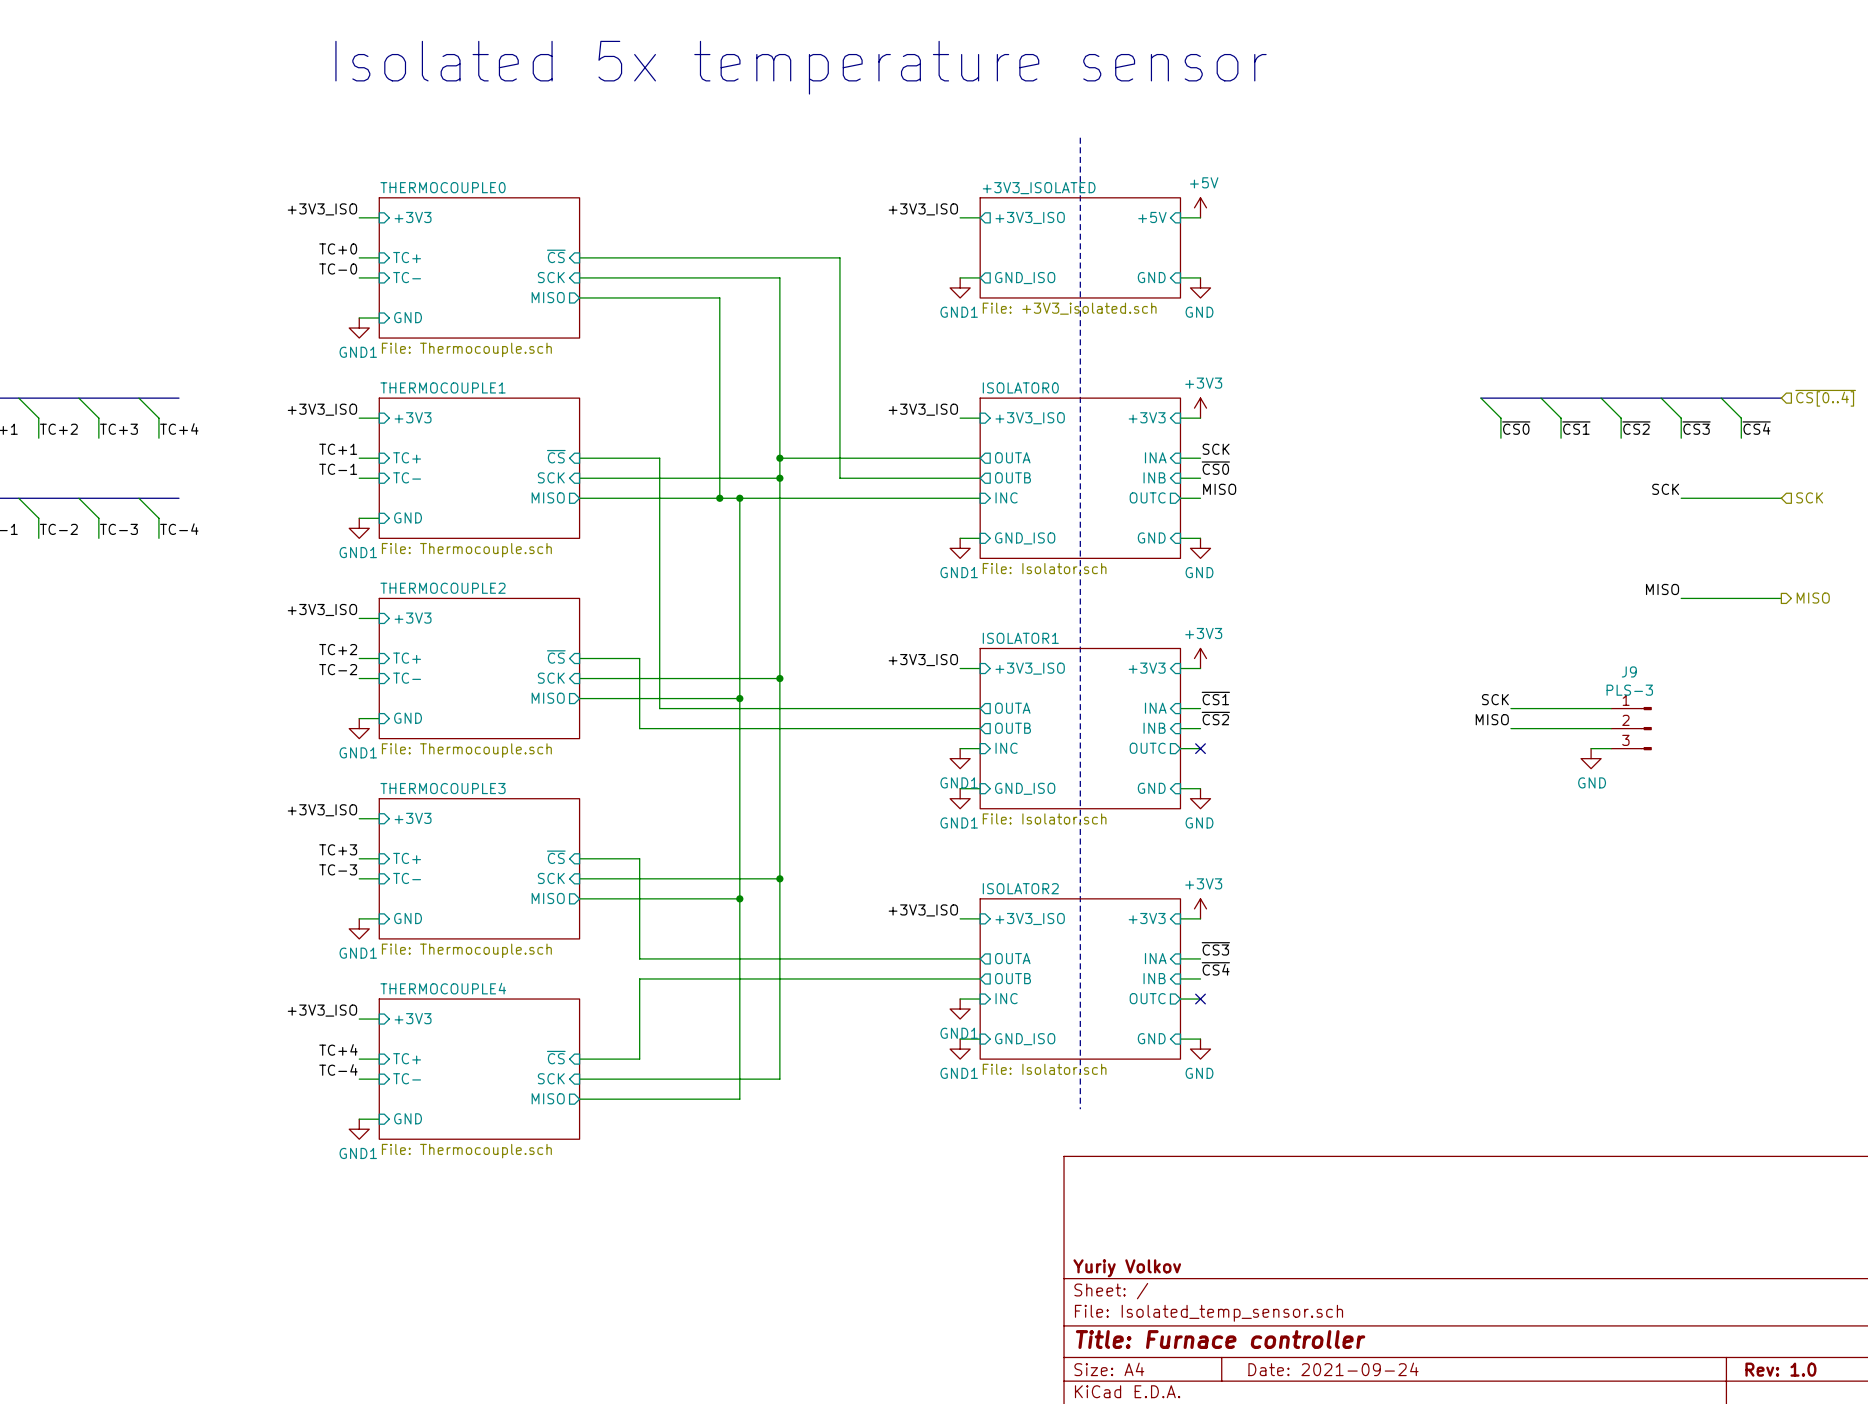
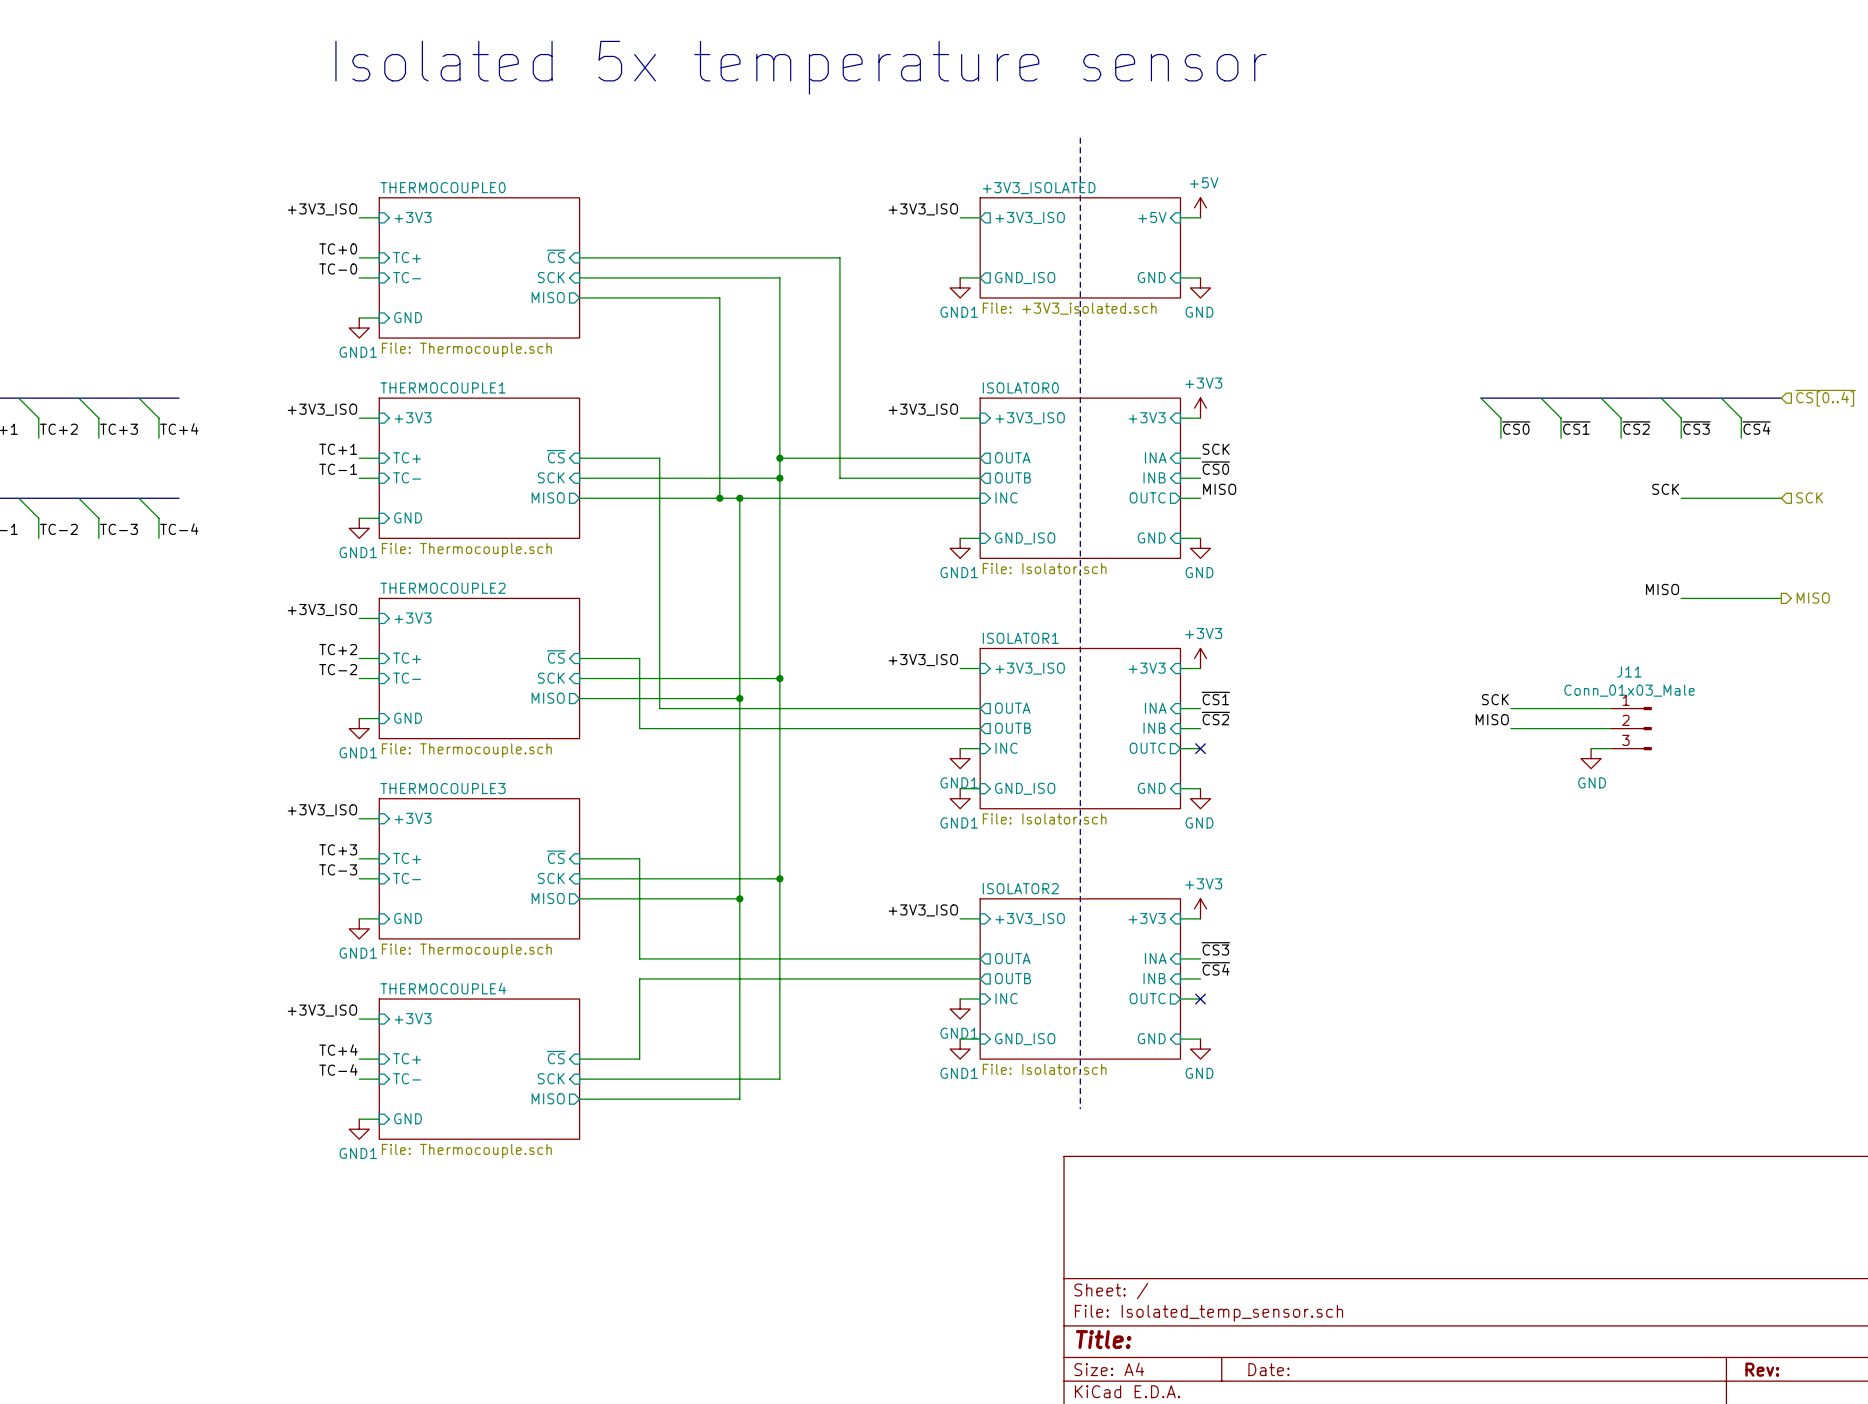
J9 name: J9 (1629, 671) -> J11 (1629, 671)
J9 value: PLS-3 (1629, 690) -> Conn_01x03_Male (1629, 690)
title block: Yuriy Volkov (1127, 1268) -> none
title block: Title: Furnace controller (1220, 1339) -> Title: (1103, 1339)
title block: Date: 2021-09-24 (1333, 1369) -> Date: (1268, 1369)
title block: Rev: 1.0 (1780, 1369) -> Rev: (1762, 1369)

